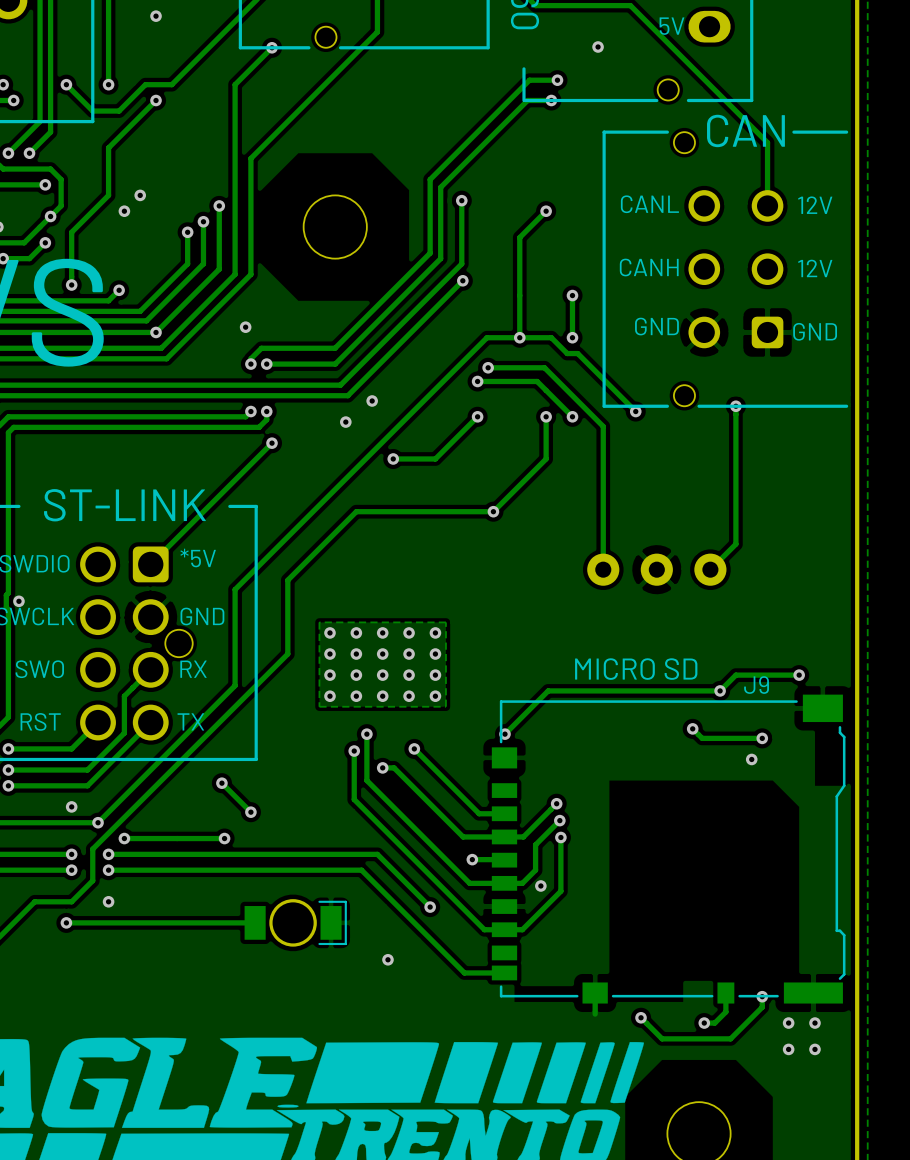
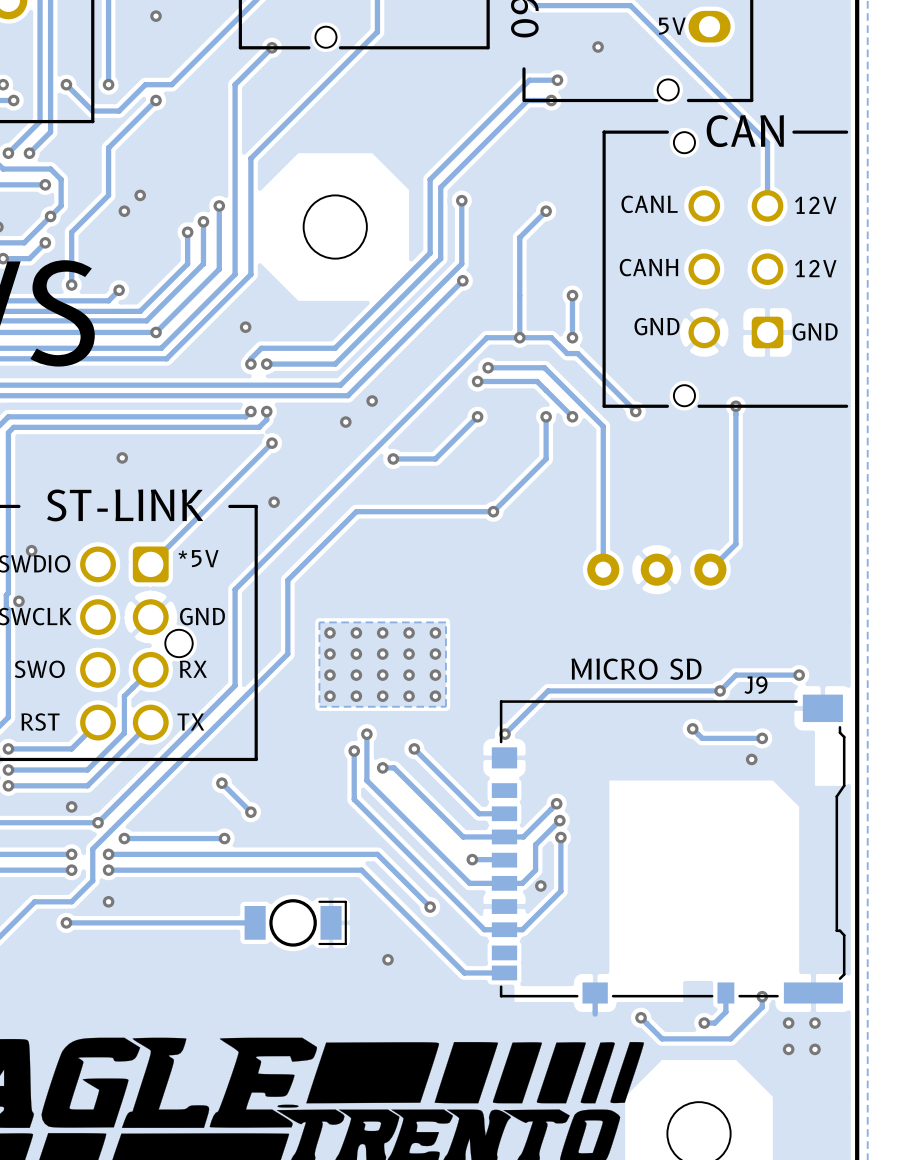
via: none -> (122, 457)
via: none -> (274, 502)
via: none -> (31, 550)

